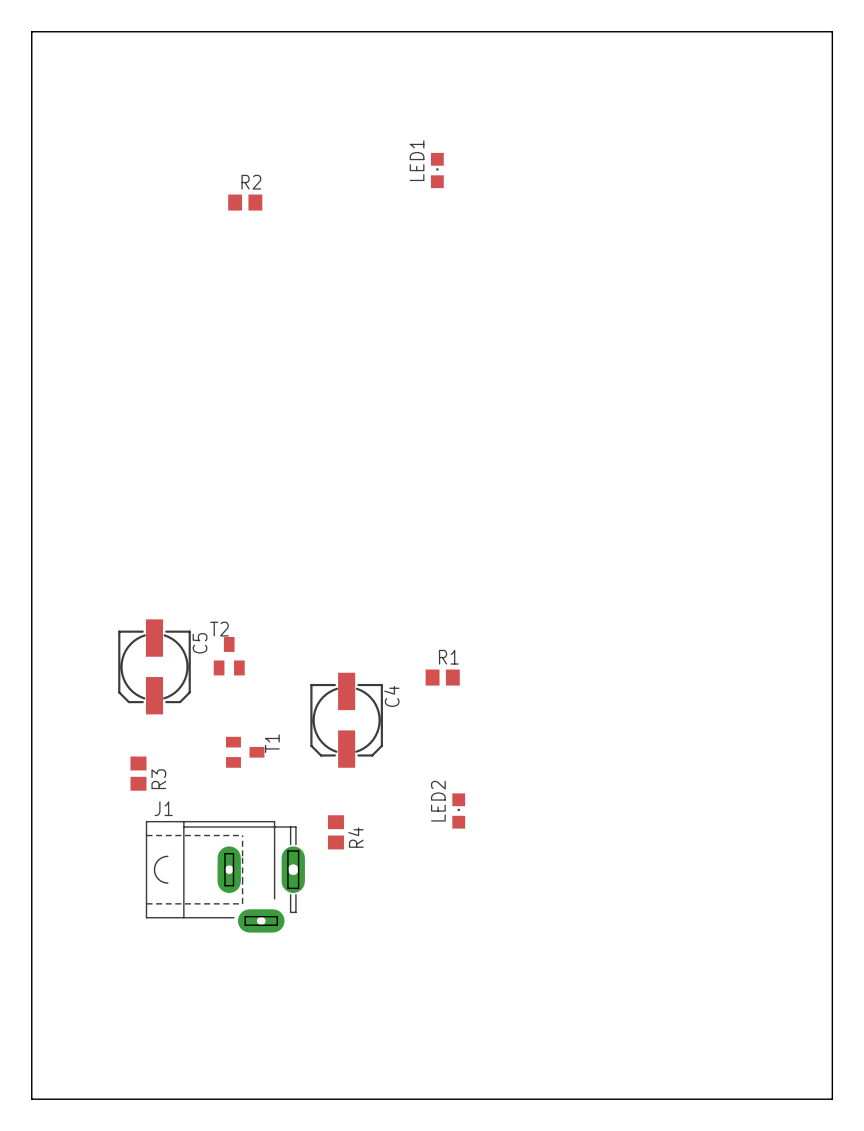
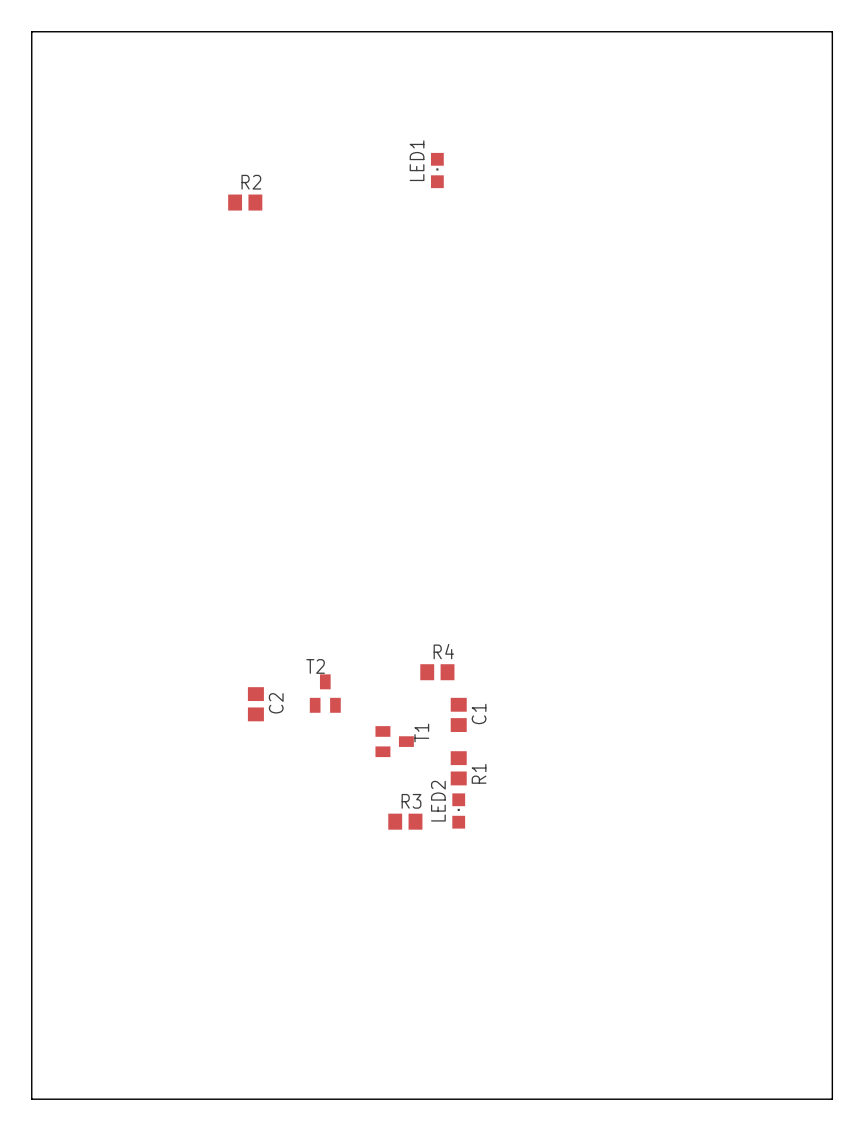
T2 position: (229, 656) -> (325, 693)
C5: (154, 666) -> none
R1 rotation: 0° (442, 677) -> 90° clockwise (458, 768)
R1 position: (442, 677) -> (458, 768)
C2: none -> (255, 704)
C1: none -> (458, 714)
C4: (346, 720) -> none
T1 position: (245, 752) -> (394, 741)
R3 rotation: 0° (138, 773) -> 90° clockwise (405, 821)
R3 position: (138, 773) -> (405, 821)
R3 name position: R3 (158, 779) -> R3 (411, 801)
R4 rotation: 0° (335, 832) -> 90° clockwise (437, 672)
R4 position: (335, 832) -> (437, 672)
R4 name position: R4 (355, 837) -> R4 (443, 651)
J1: (225, 876) -> none

